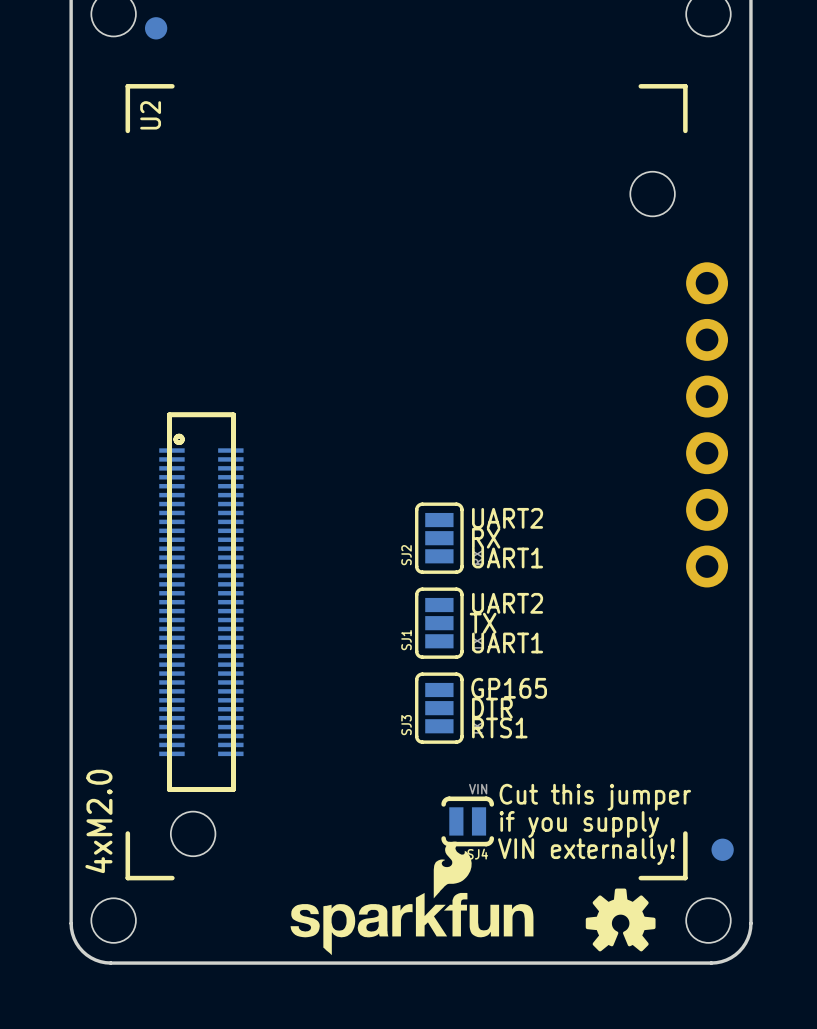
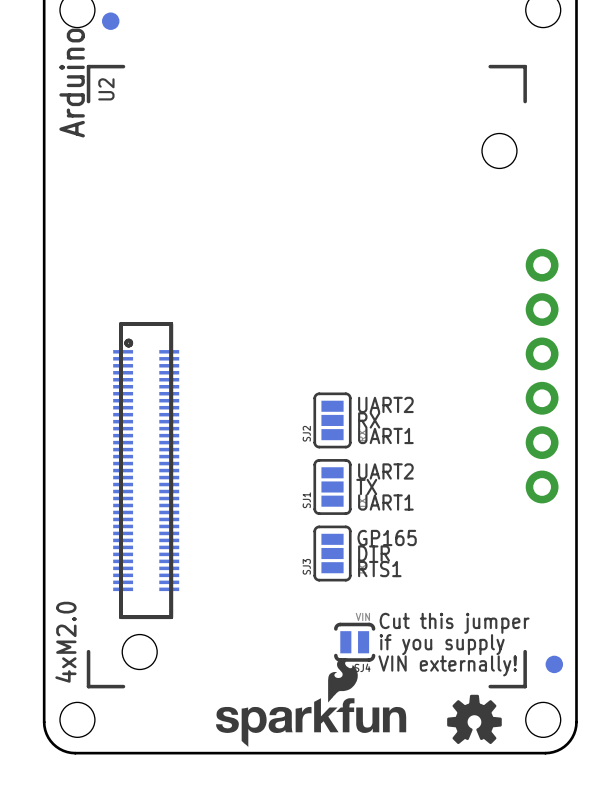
text: none -> Arduino (72, 83)
part position: (707, 424) -> (542, 376)

